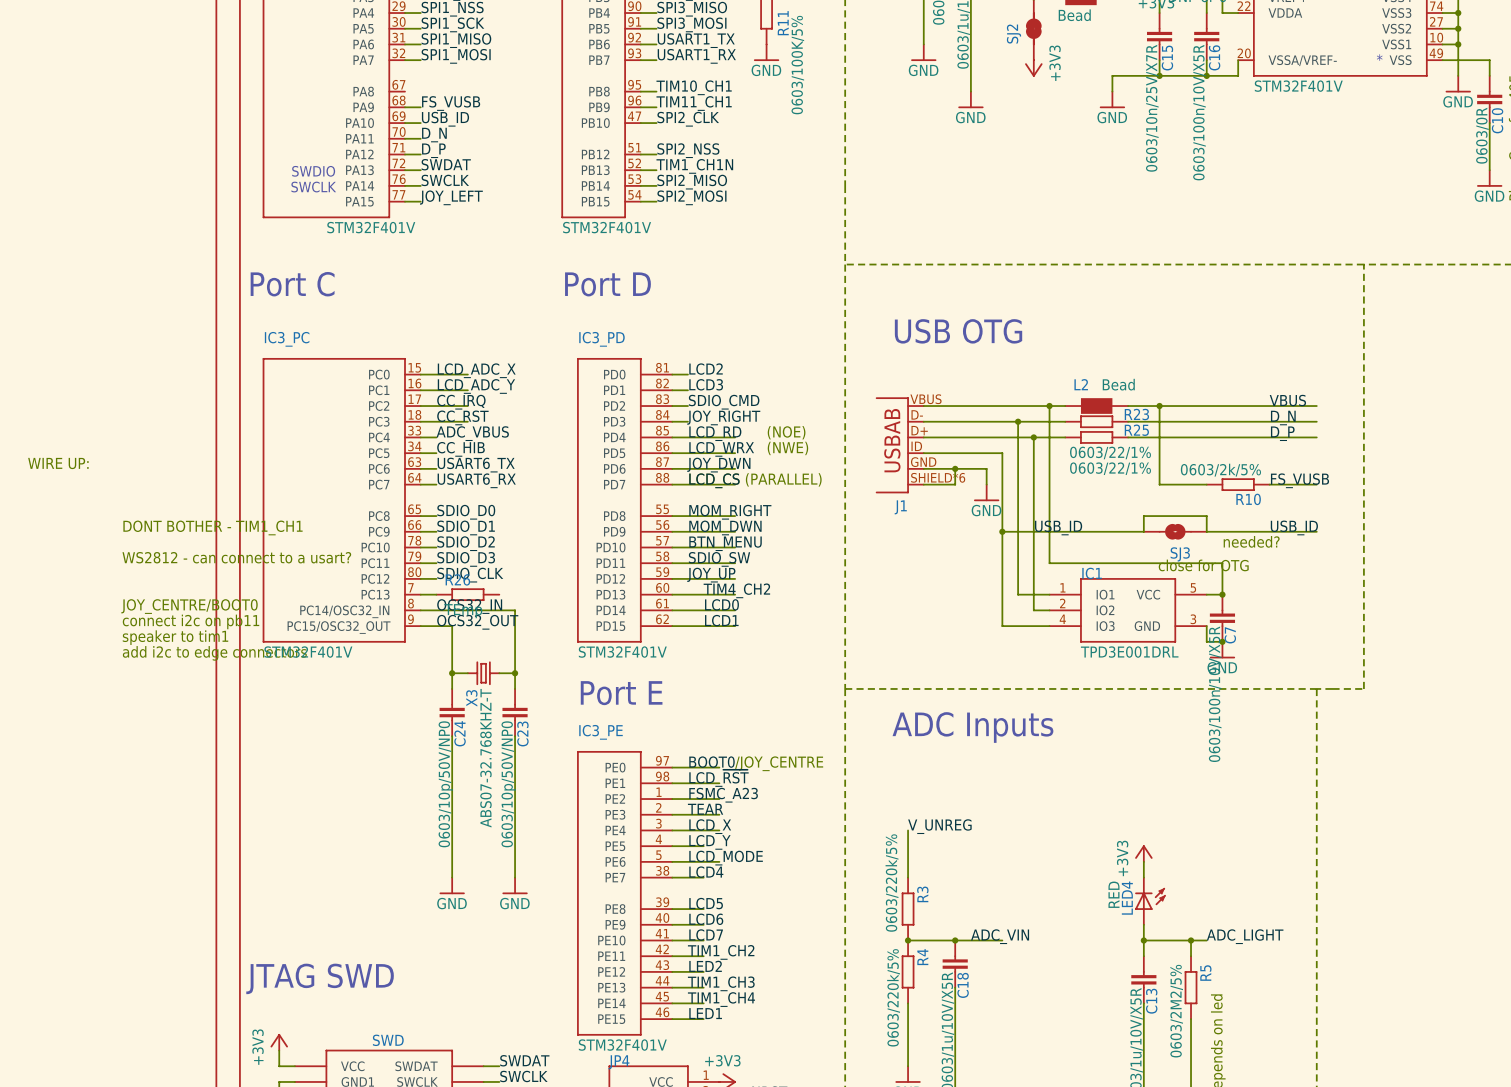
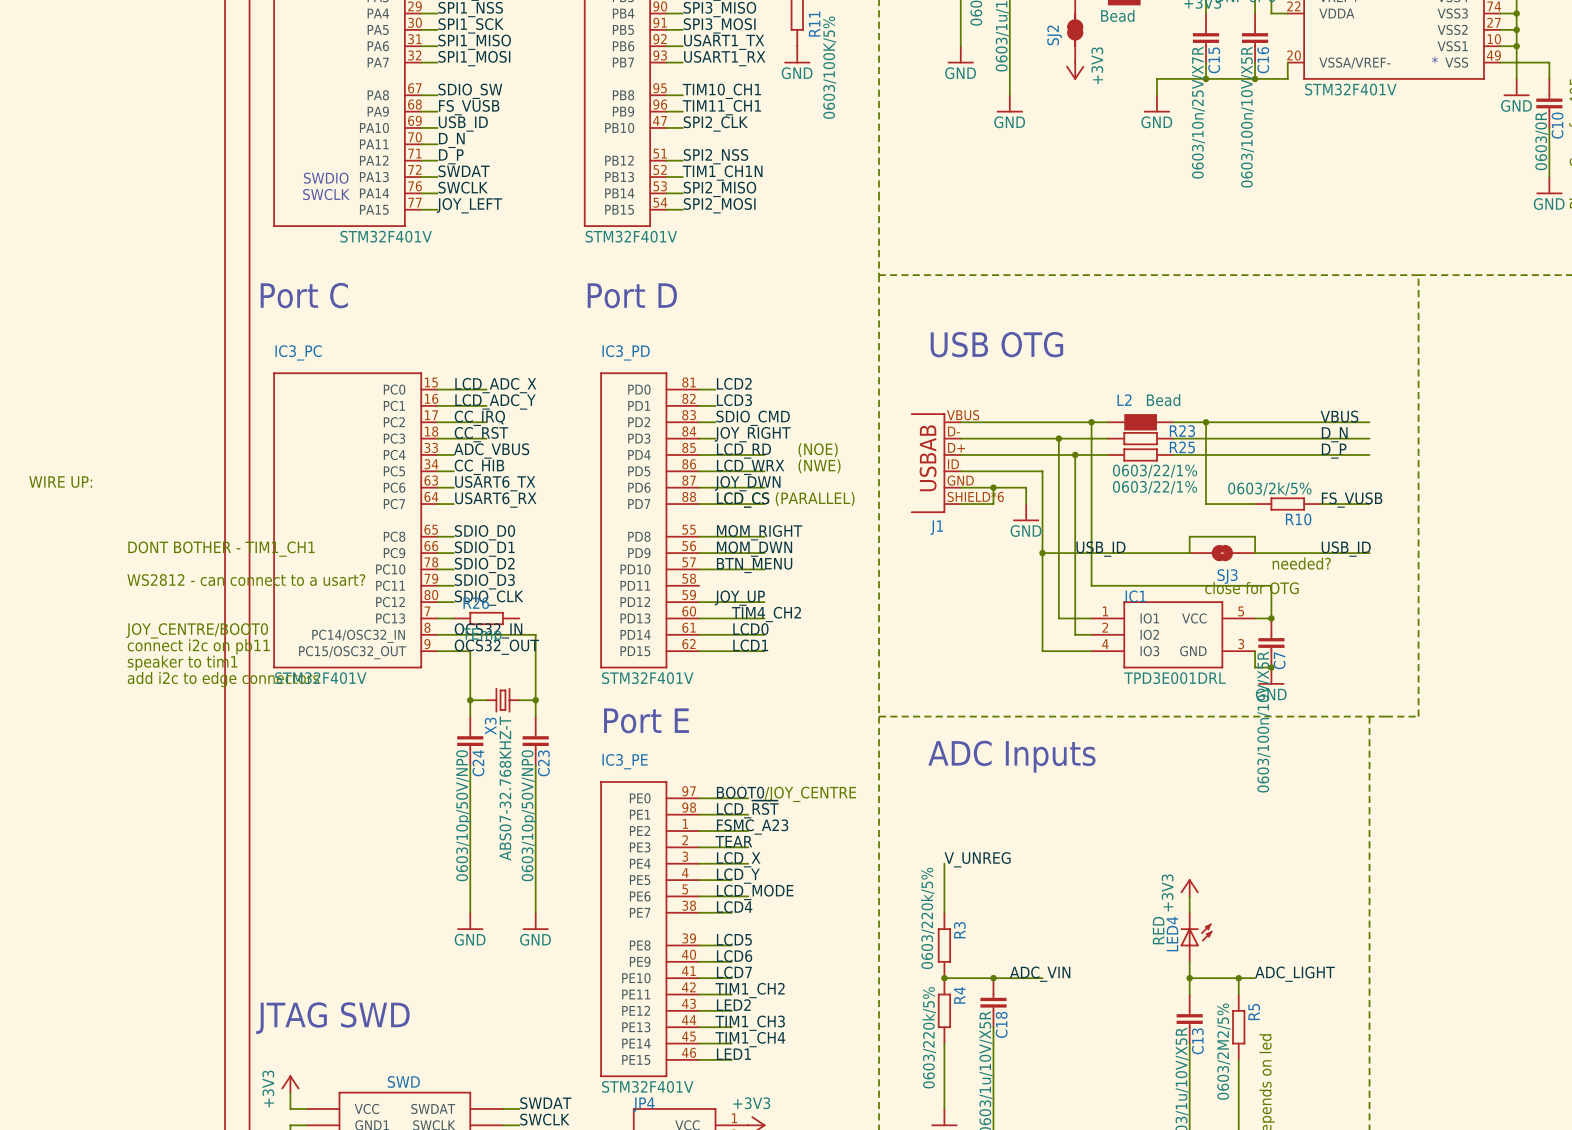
label: none -> SDIO_SW (470, 91)
wire: none -> (421, 95) (437, 95)
label: SDIO_SW (719, 559) -> none
wire: (672, 563) (735, 563) -> none

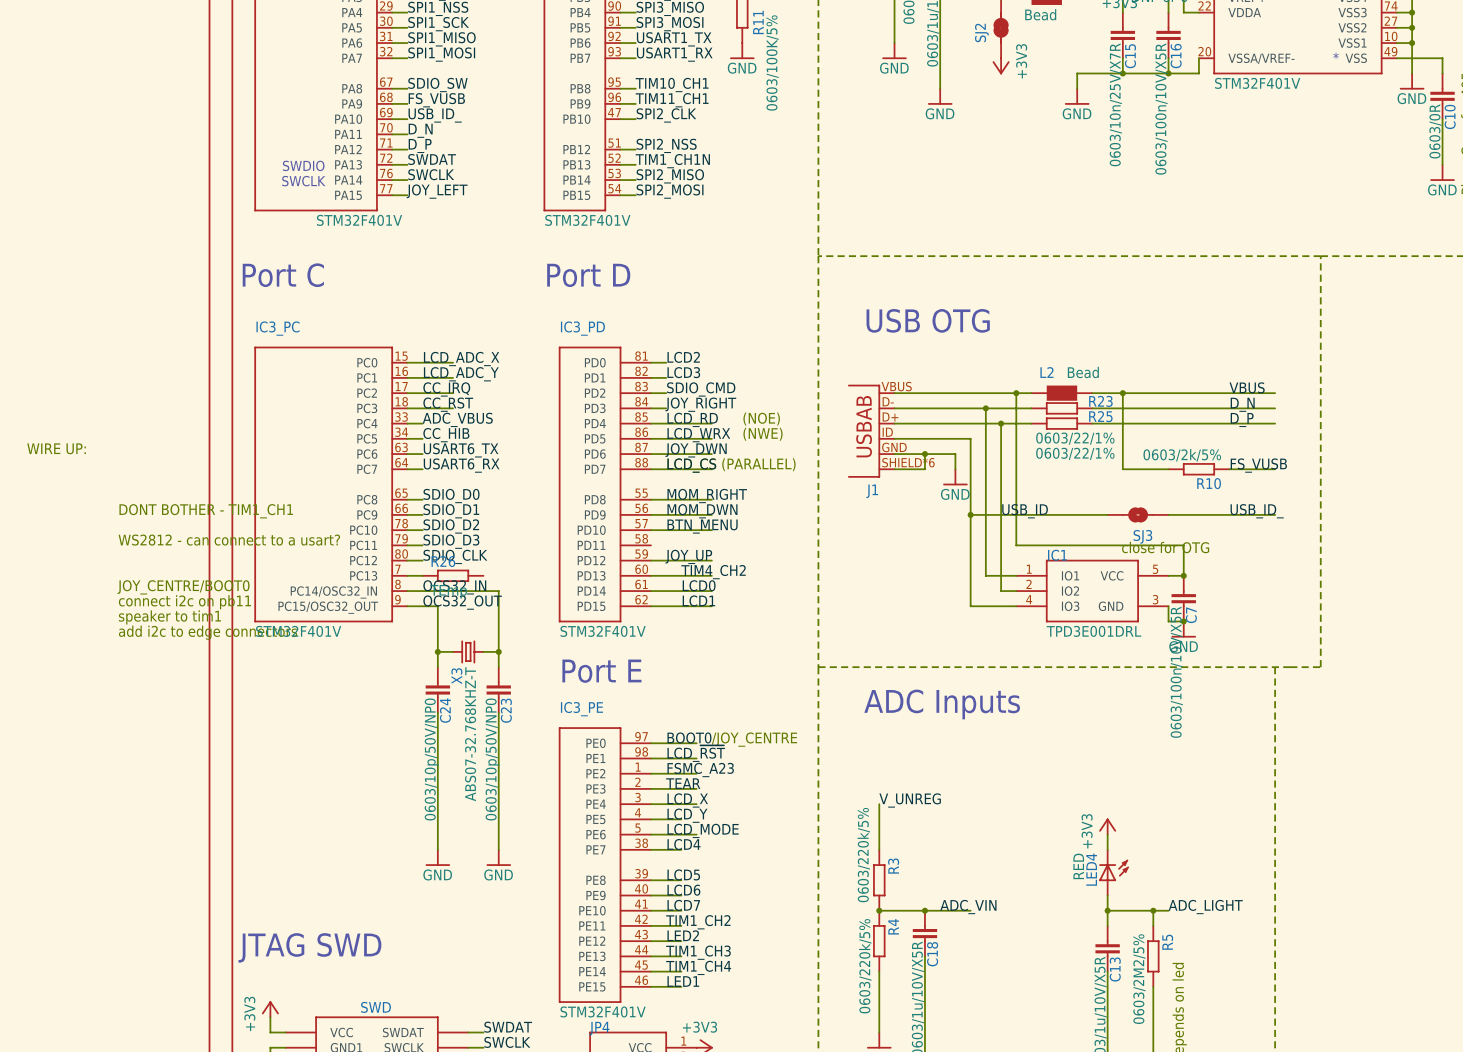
label: USB_ID (463, 124) -> USB_ID_ (435, 115)
label: USB_ID (1346, 549) -> USB_ID_ (1257, 511)
wire: (1189, 553) (1189, 536) (1255, 536) (1255, 553) -> none
text: needed? (1301, 563) -> none

